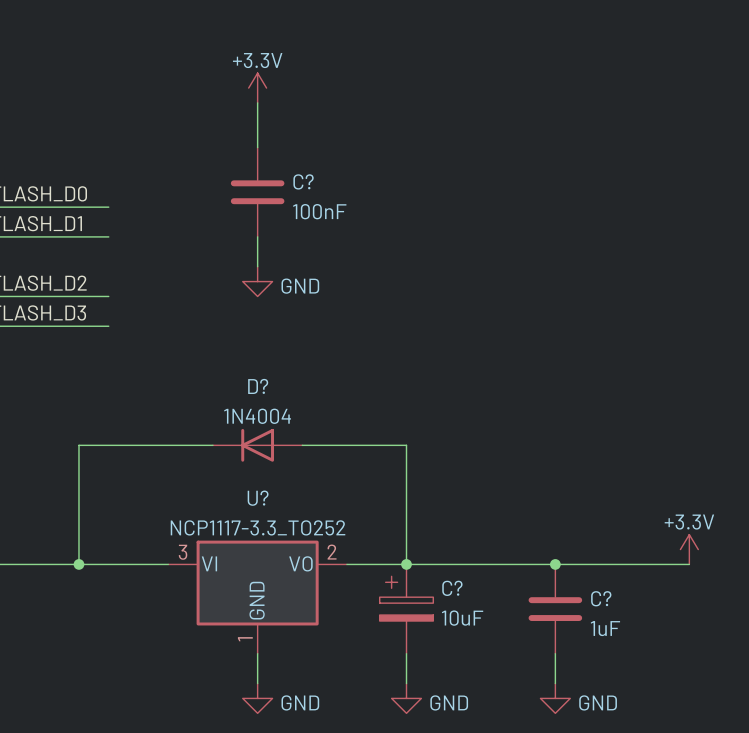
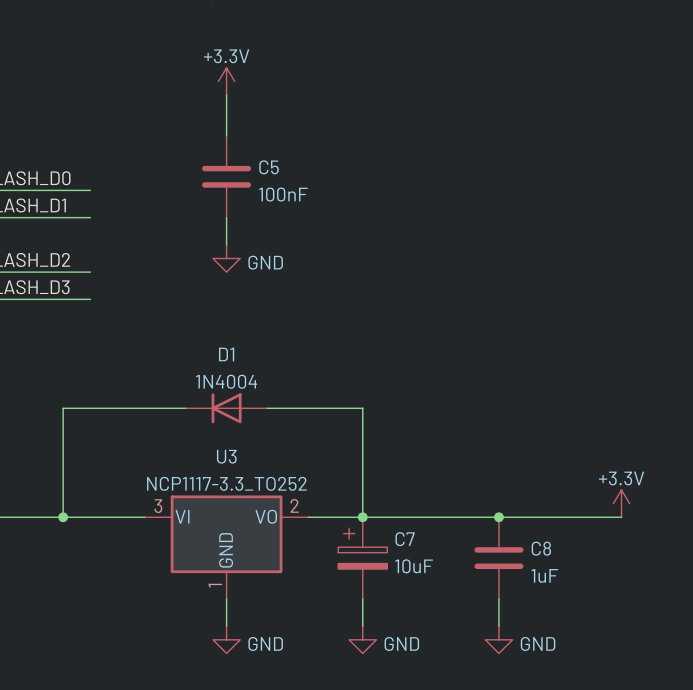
C? name: C? (303, 181) -> C5 (269, 167)
D? name: D? (258, 386) -> D1 (226, 354)
U? name: U? (258, 498) -> U3 (226, 456)
C? name: C? (452, 588) -> C7 (405, 539)
C? name: C? (601, 598) -> C8 (541, 548)

